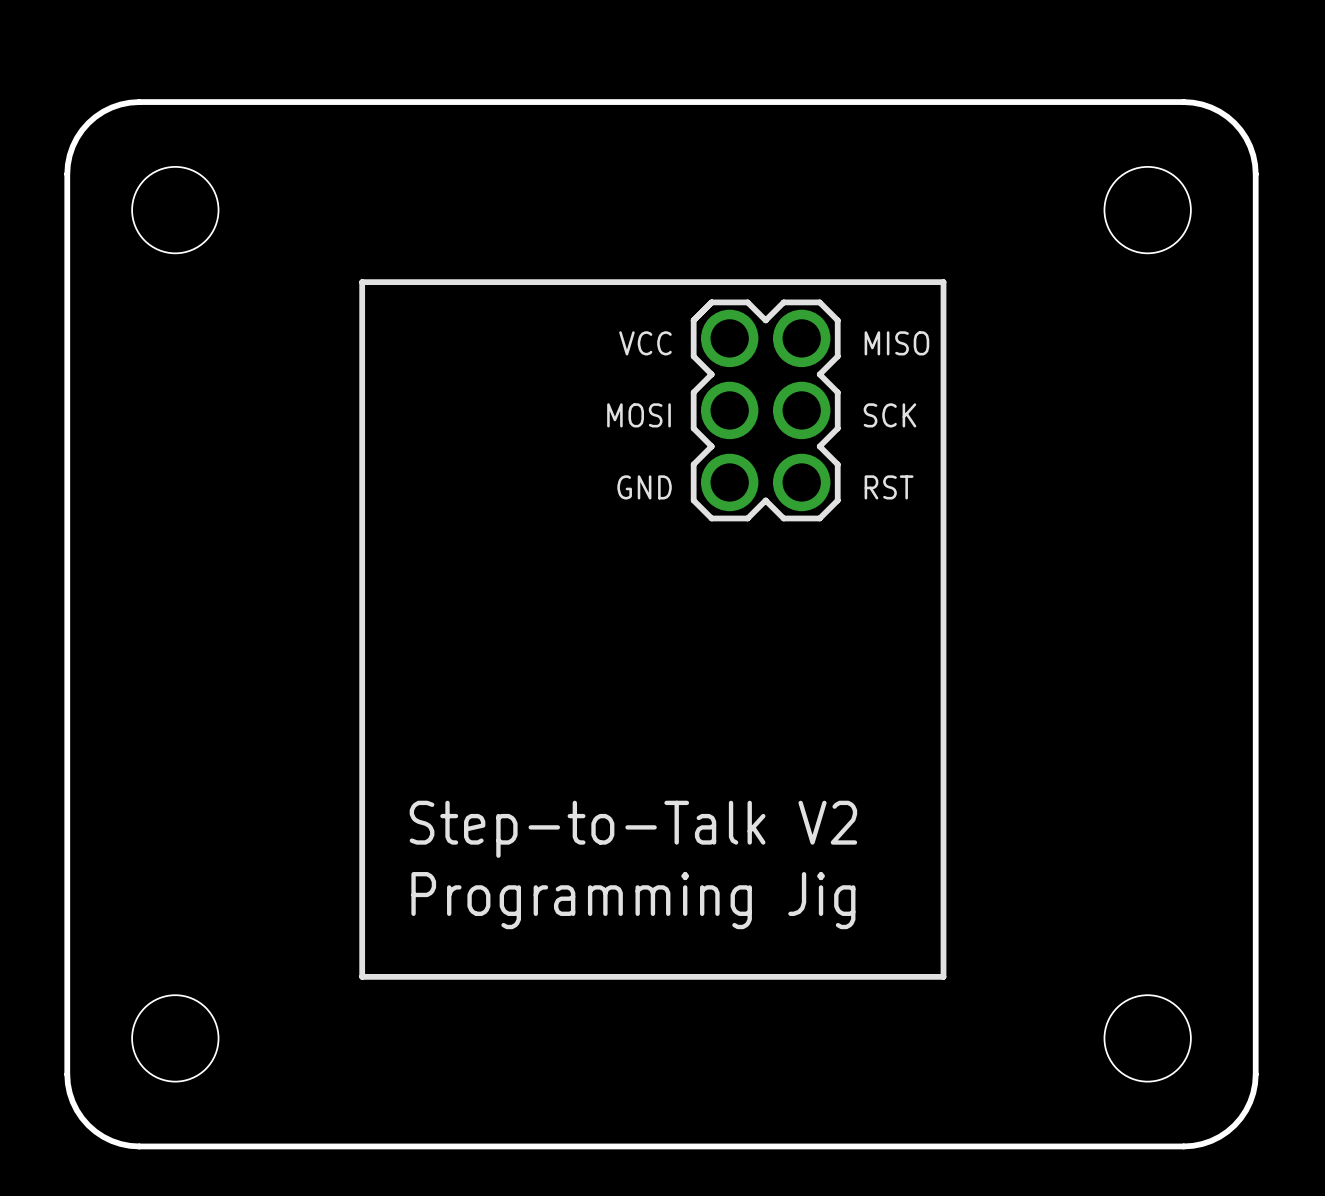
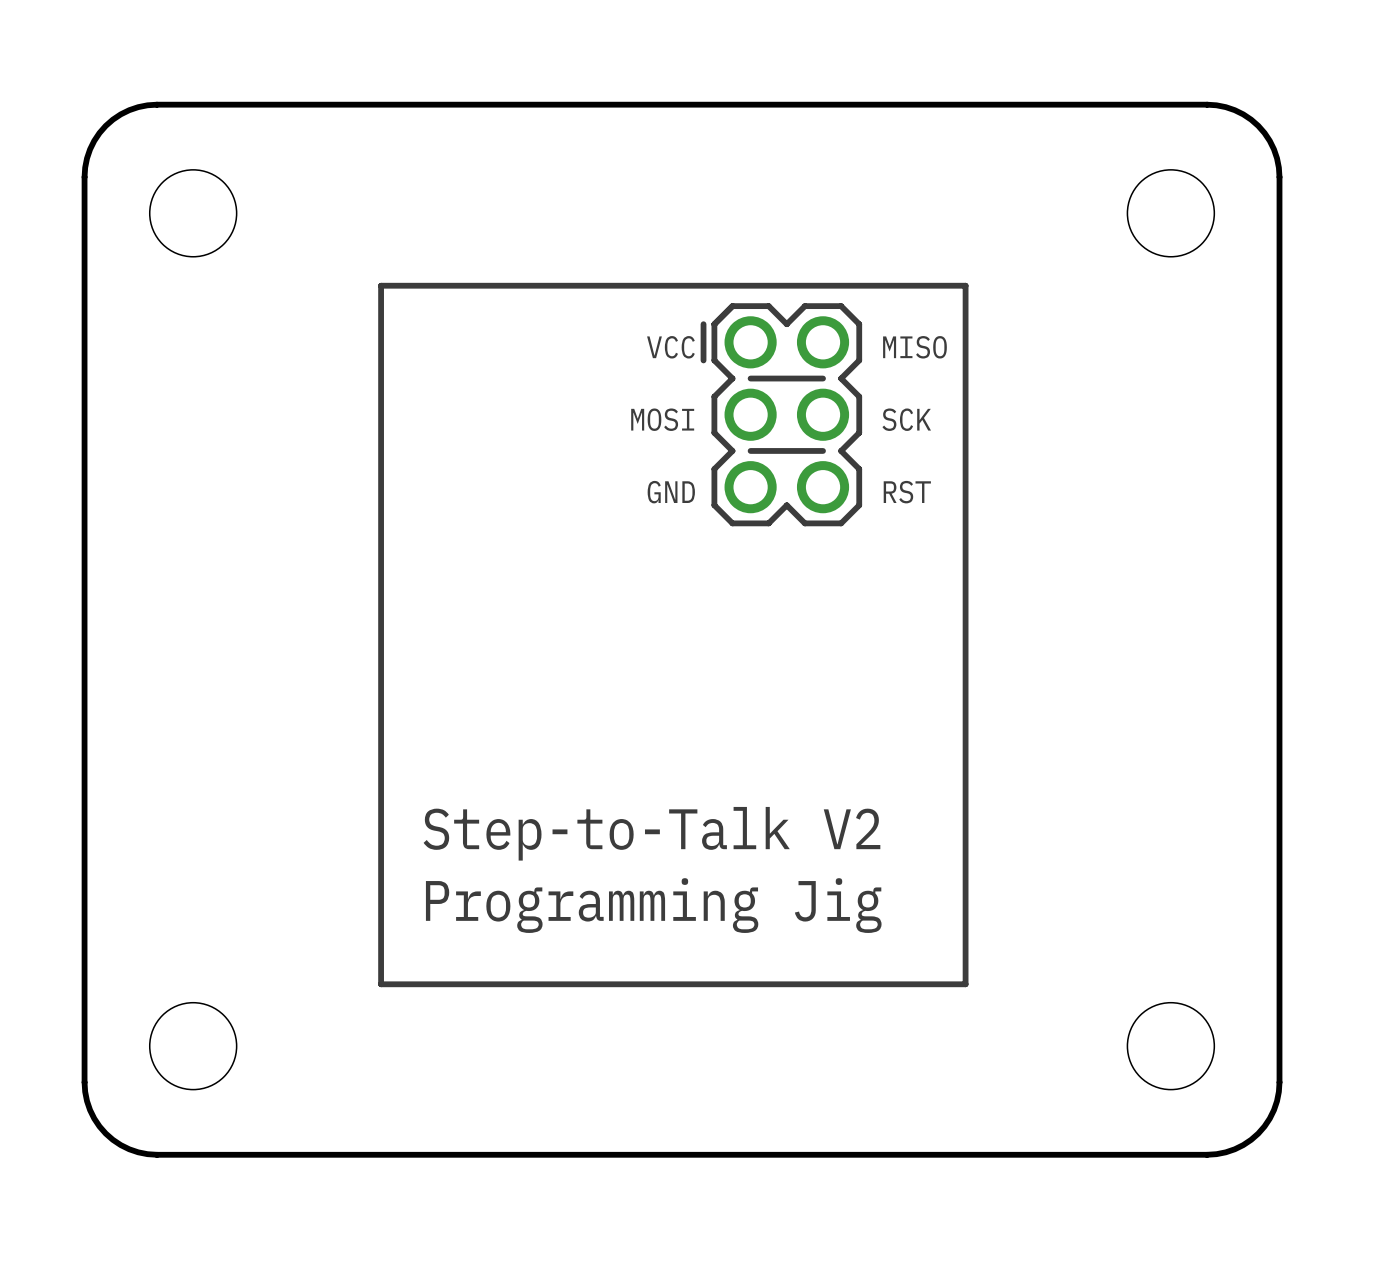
part footprint: [690, 299, 841, 522] -> [700, 303, 863, 527]

